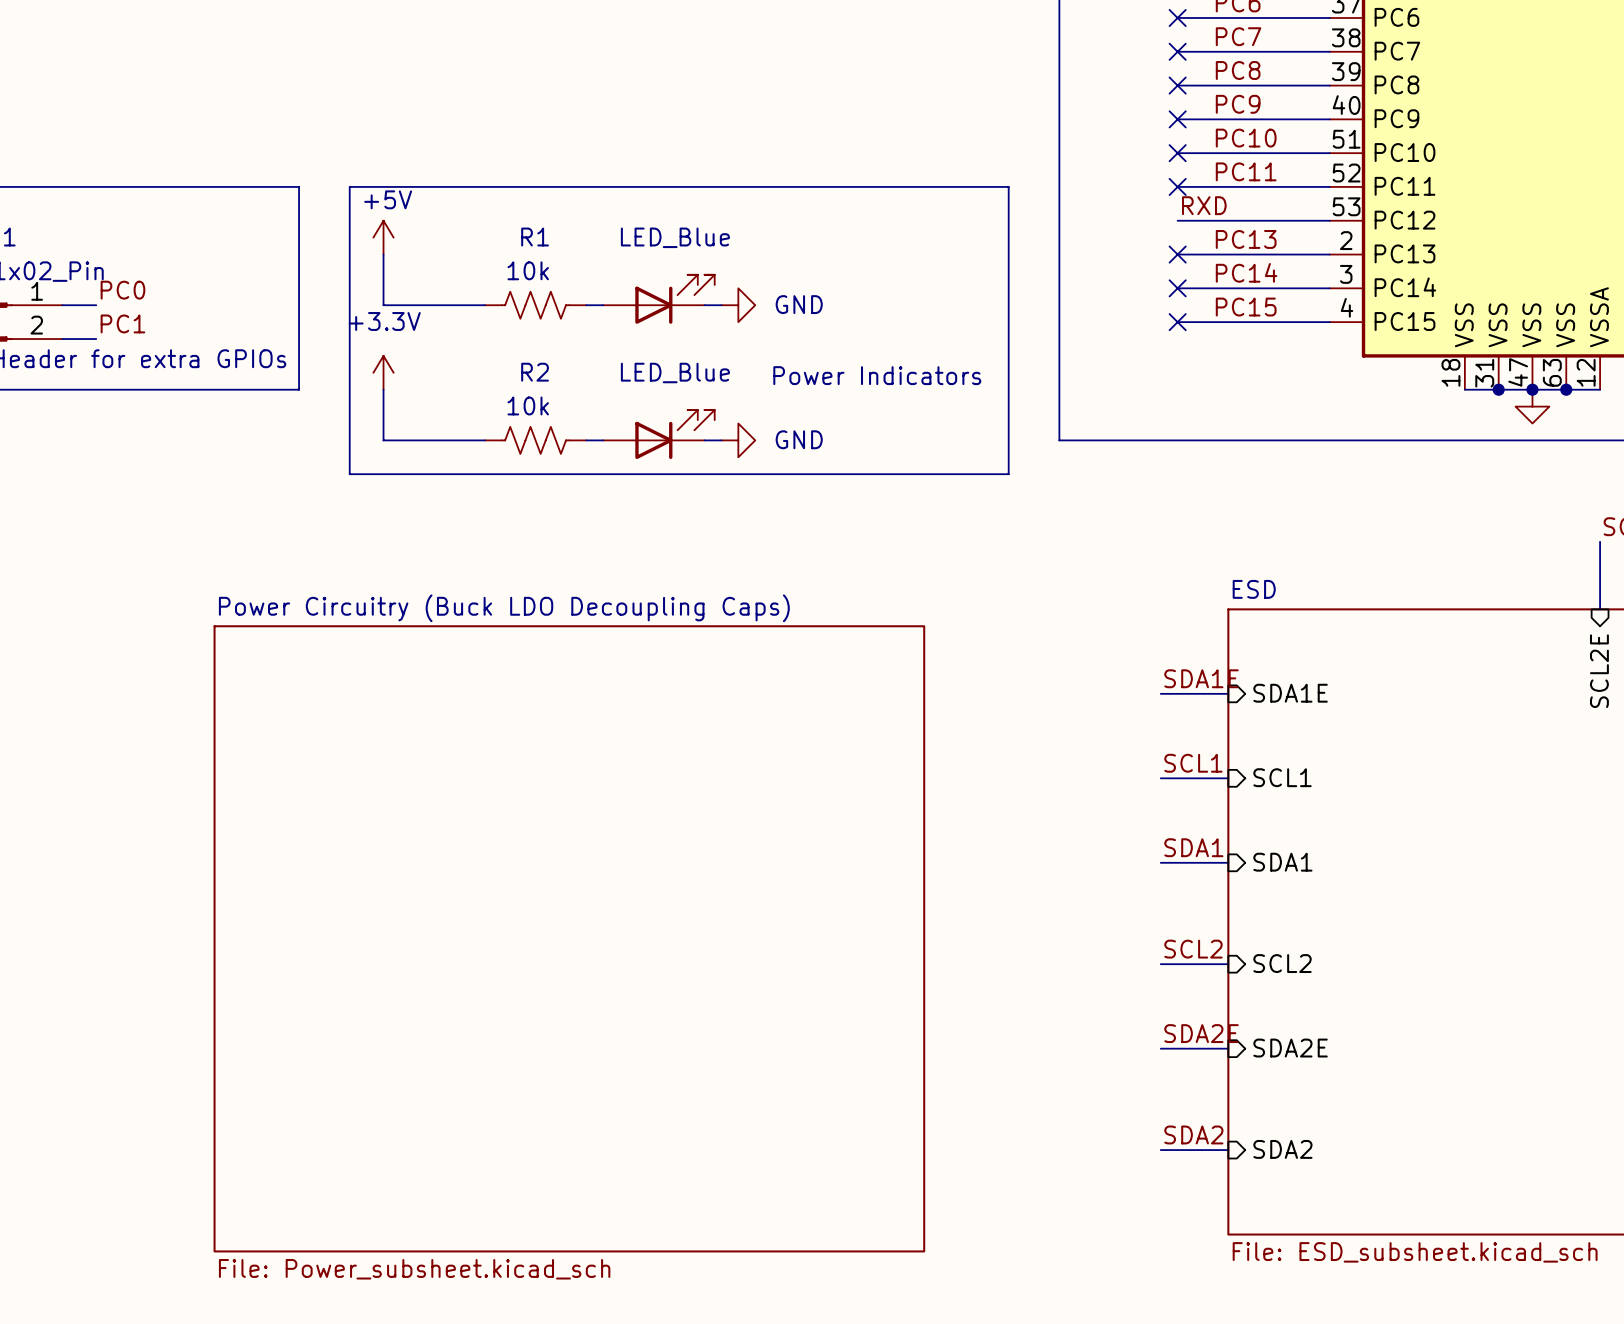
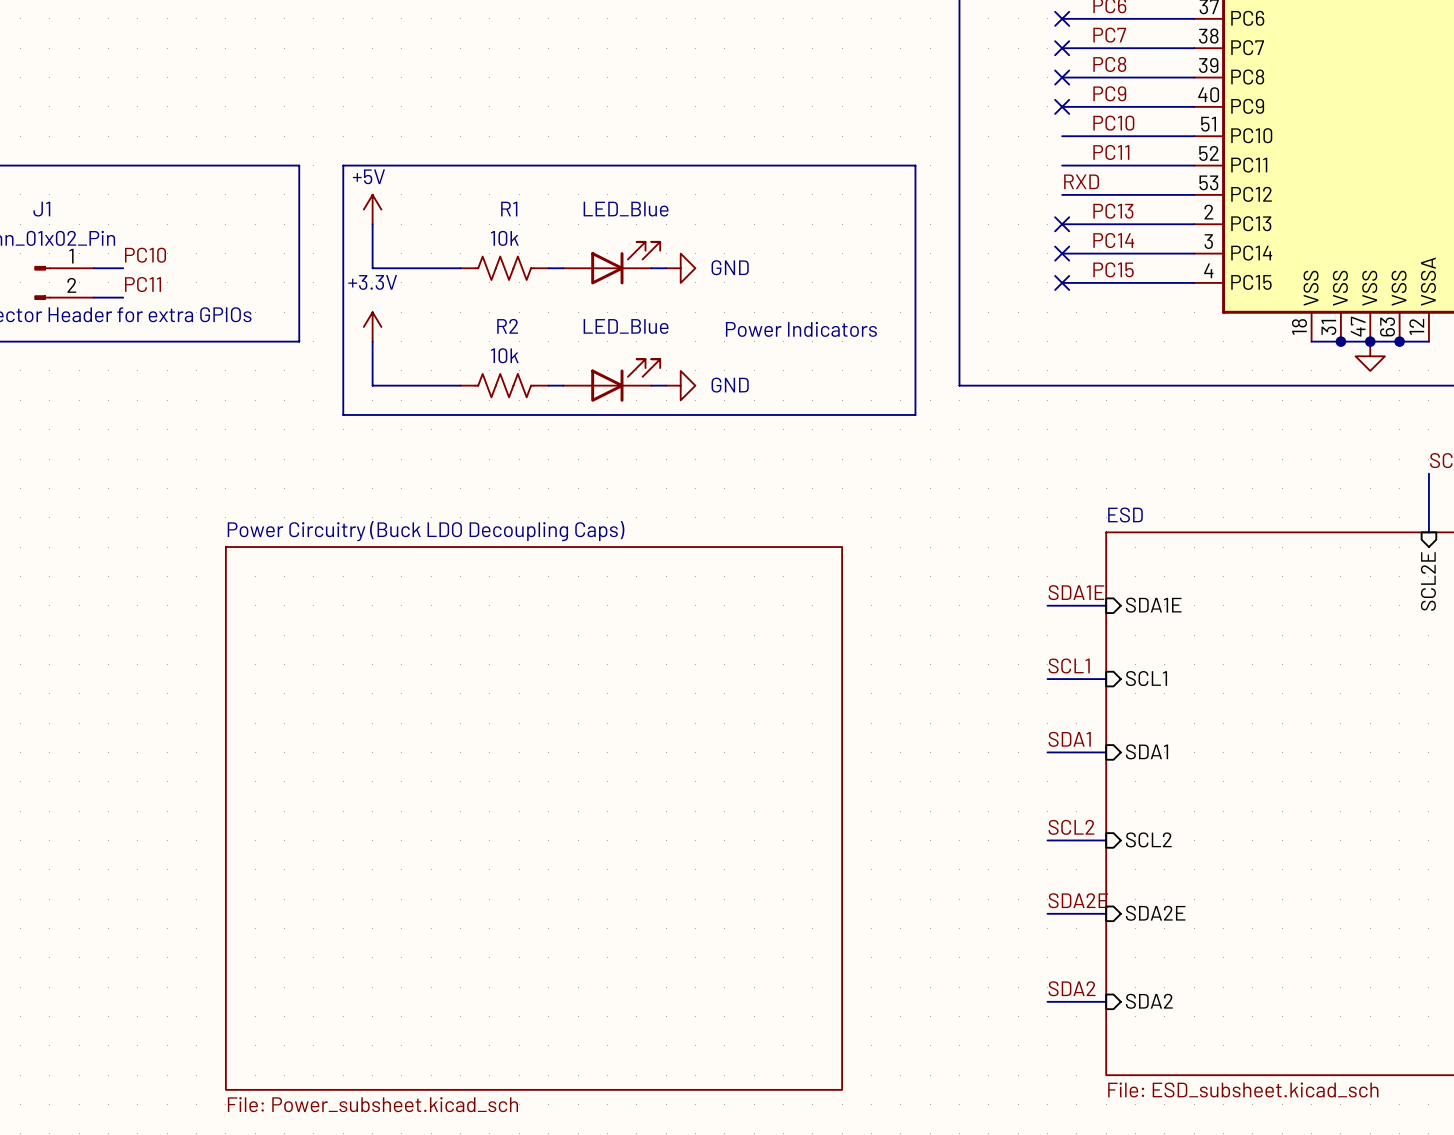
no-connect mark: (1177, 153) -> none
no-connect mark: (1177, 186) -> none
label: PC0 (122, 290) -> PC10 (145, 255)
label: PC1 (122, 323) -> PC11 (143, 284)

